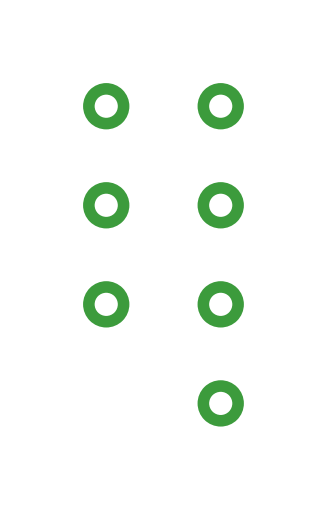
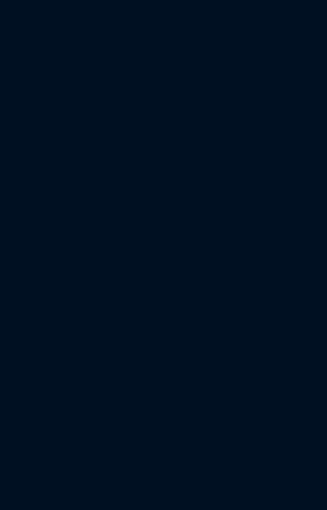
part: (106, 106) -> none
part: (220, 106) -> none
part: (106, 205) -> none
part: (220, 205) -> none
part: (106, 304) -> none
part: (220, 304) -> none
part: (220, 403) -> none

